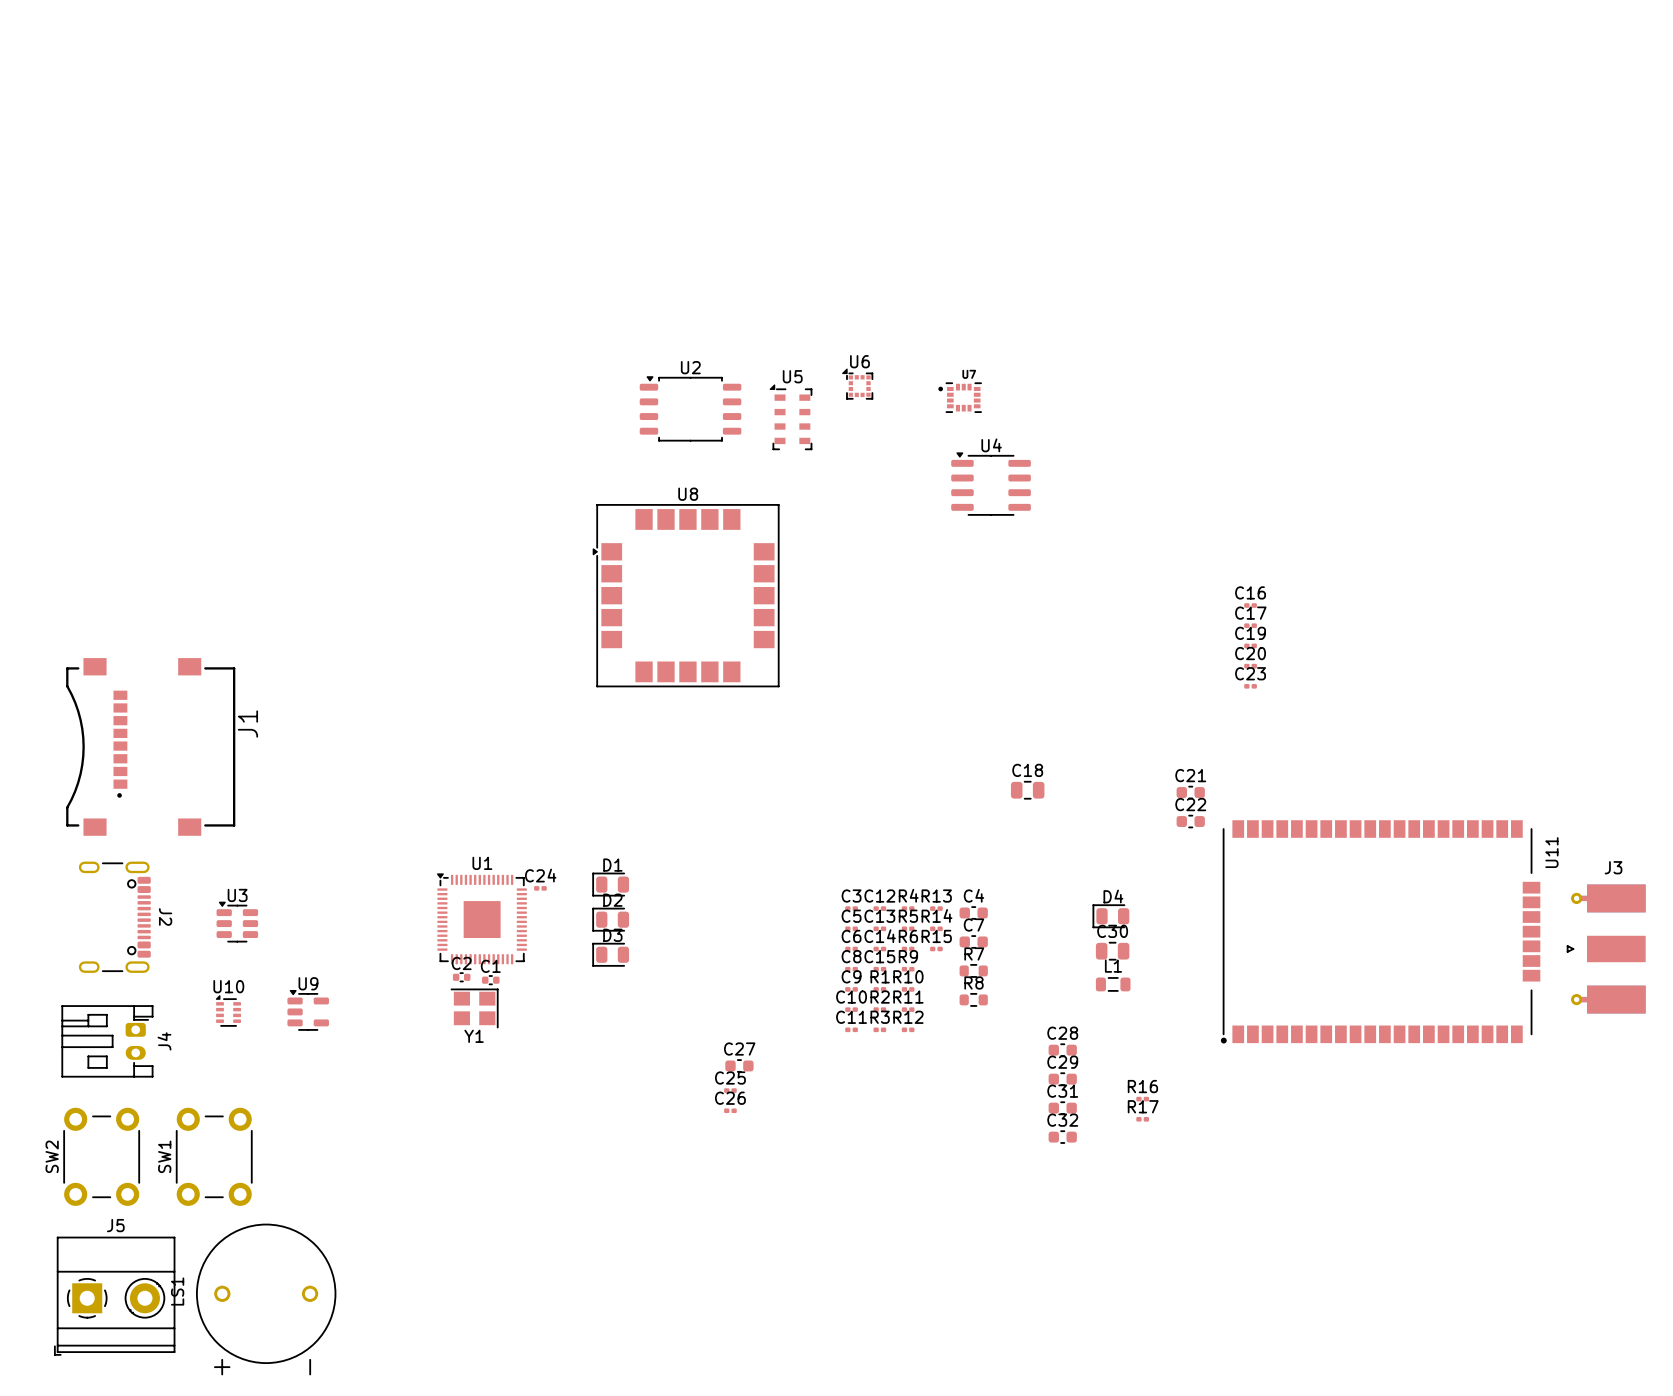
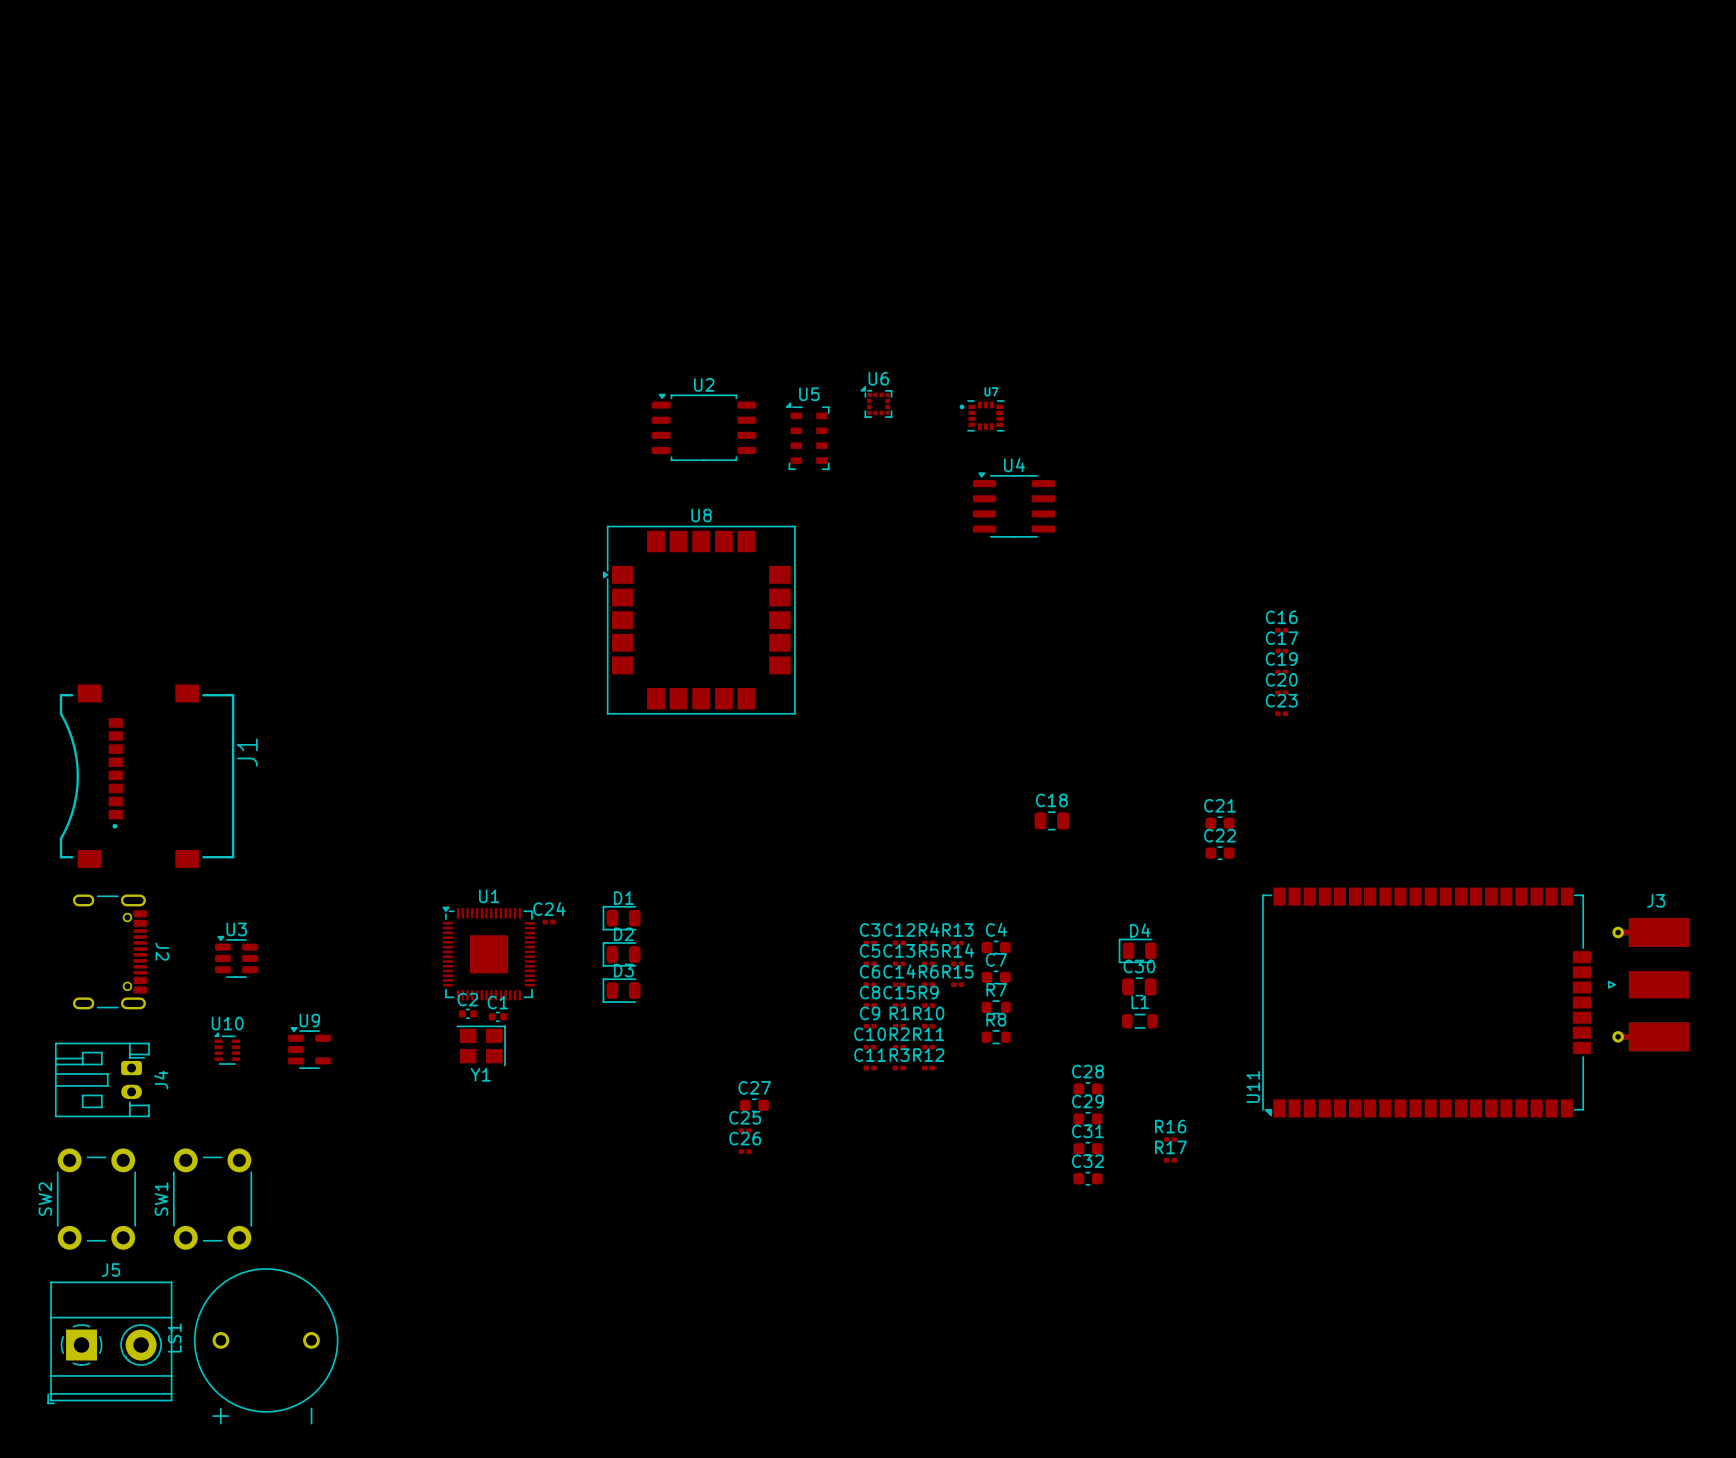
U11 footprint: [1220, 820, 1541, 1044] -> [1262, 887, 1592, 1118]
U11 name position: U11 (1551, 852) -> U11 (1253, 1086)

